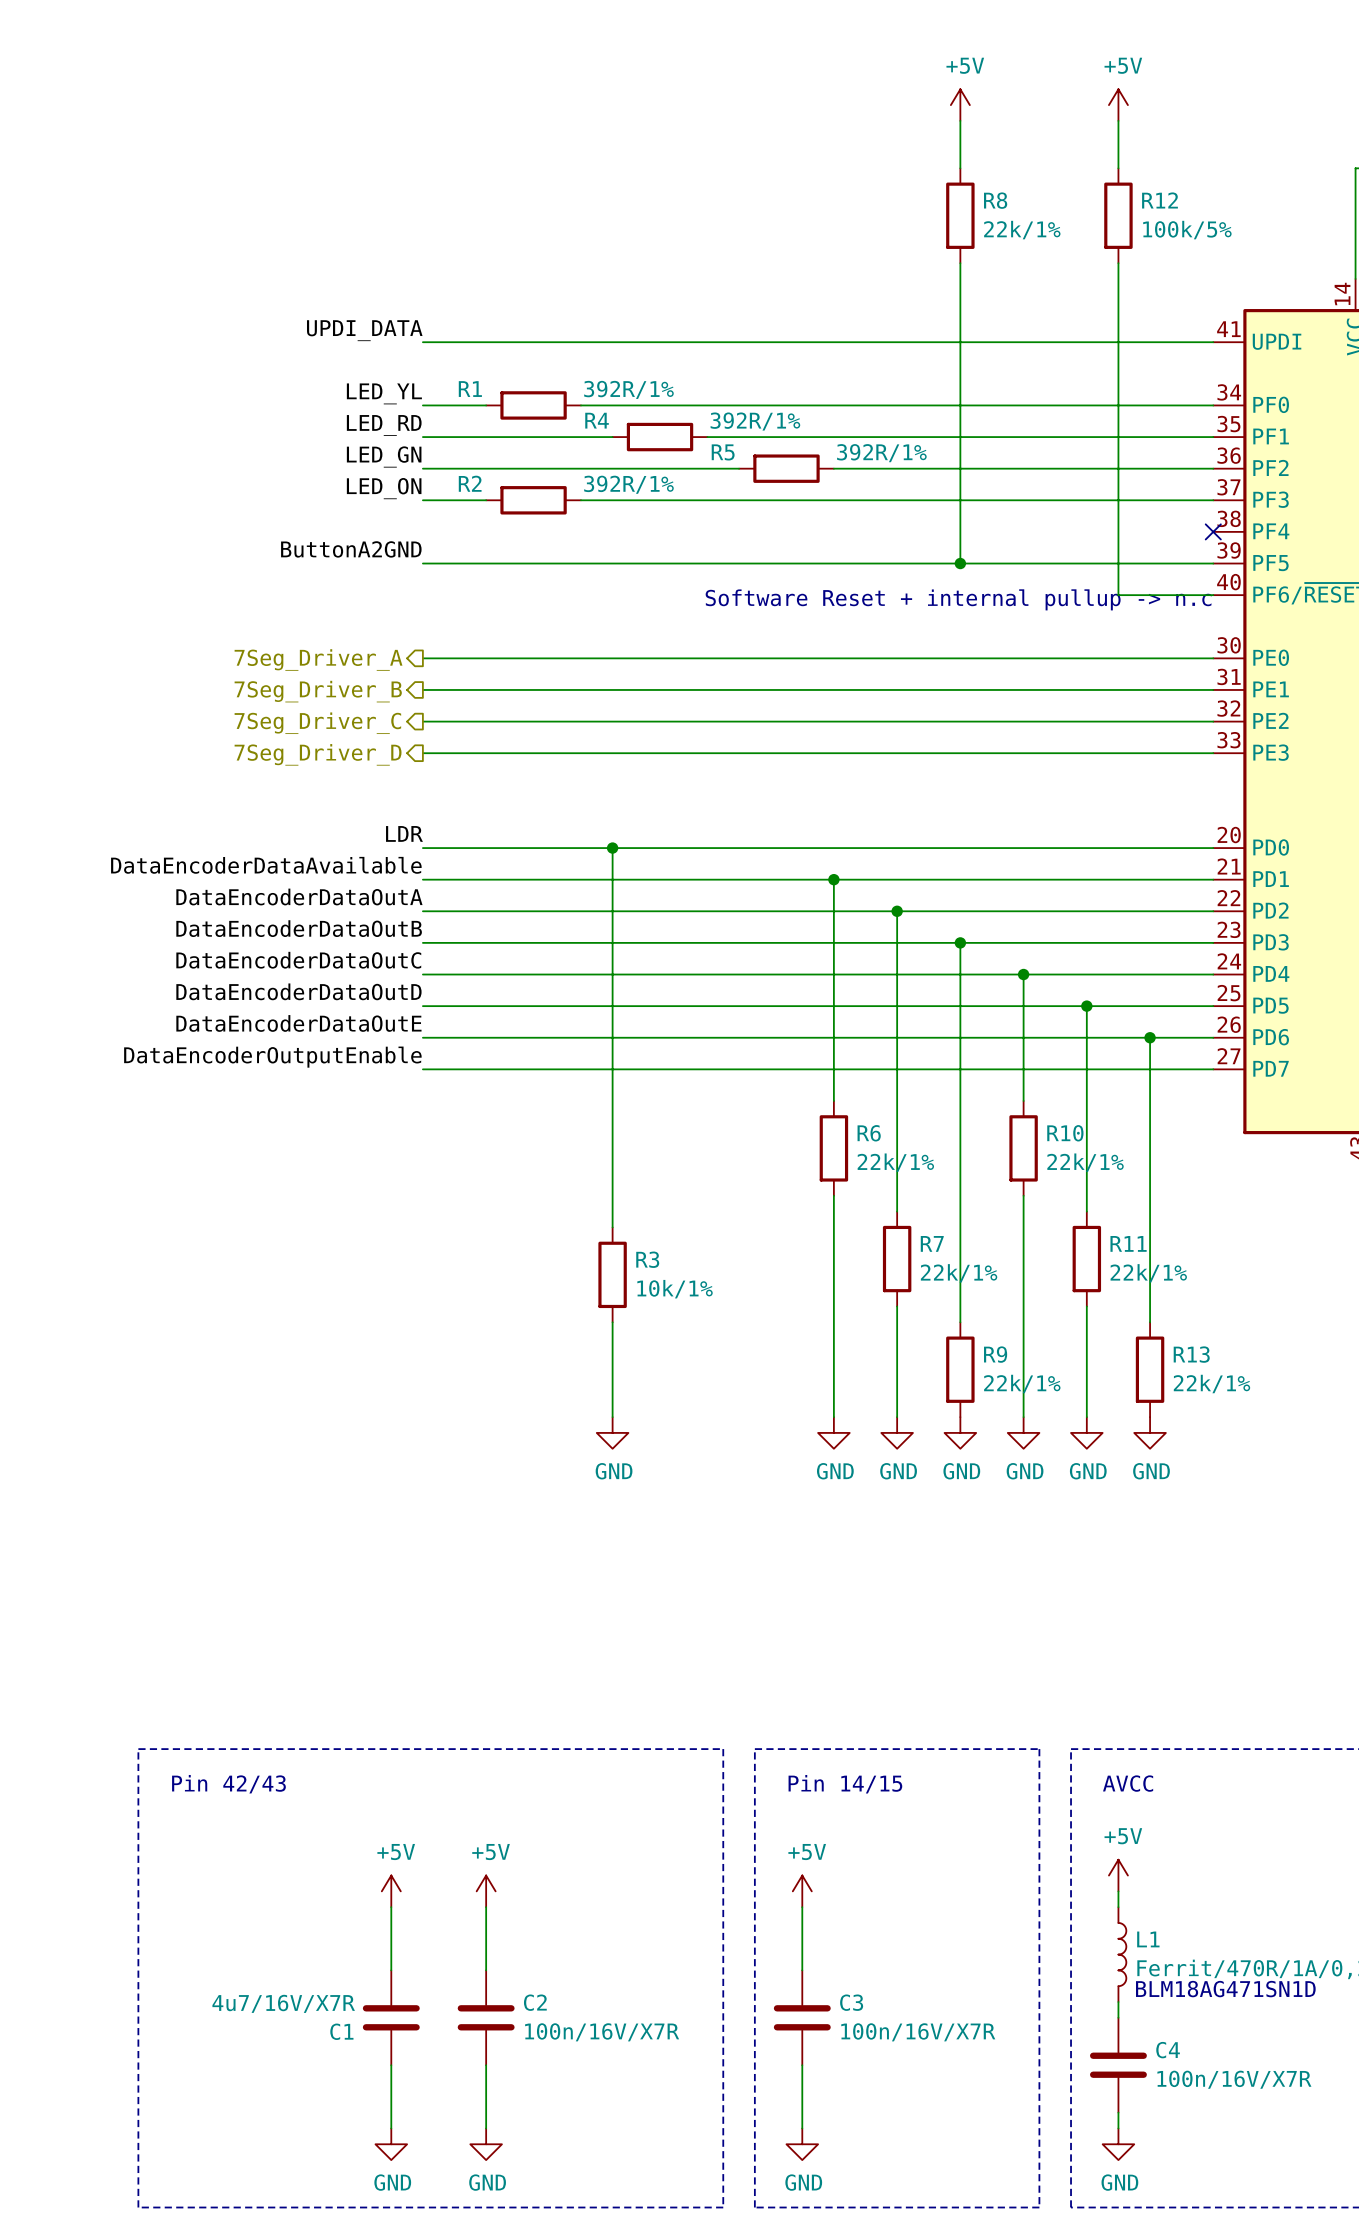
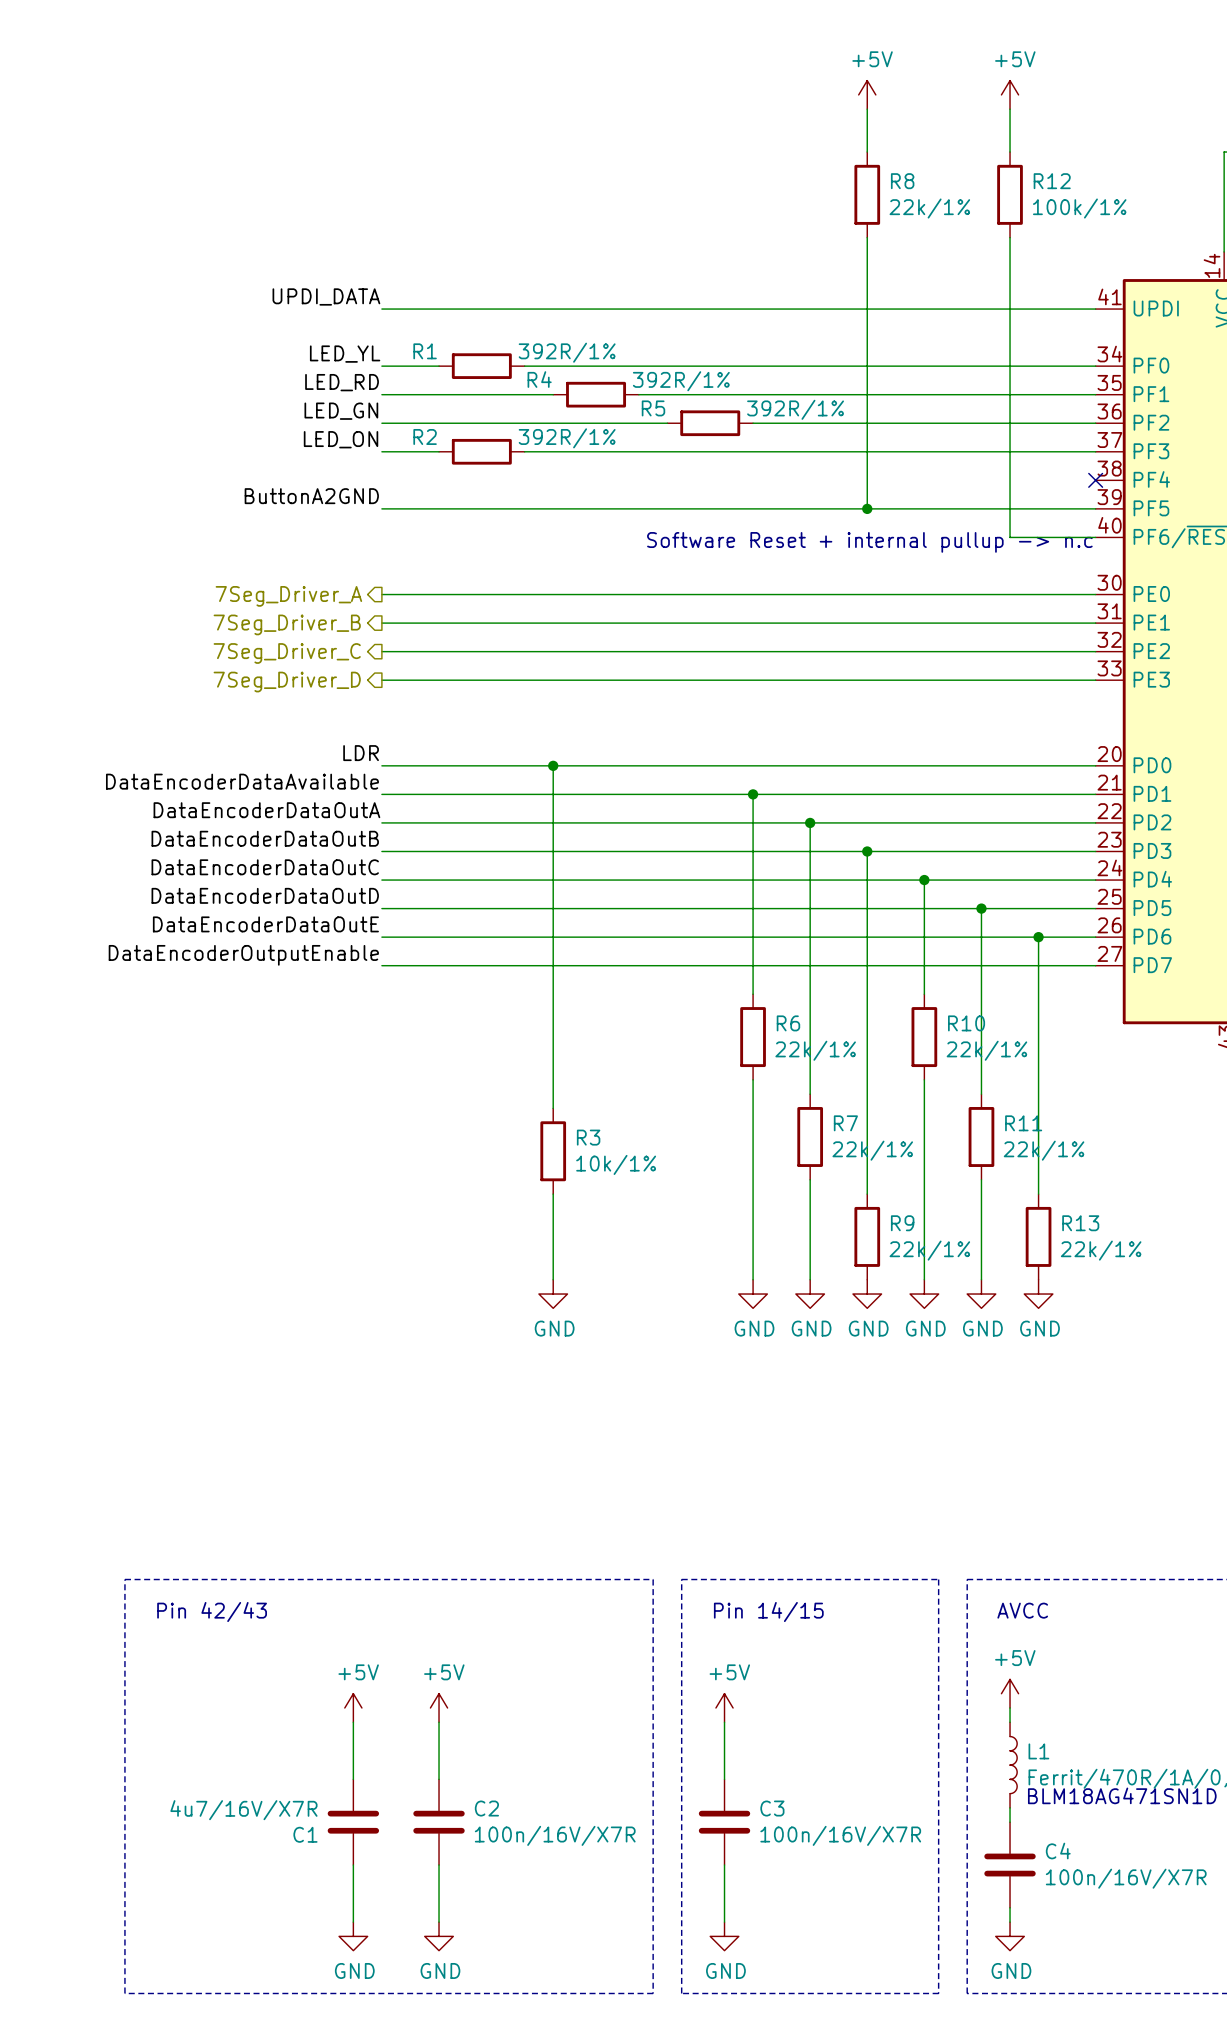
R12 value: 100k/5% (1187, 230) -> 100k/1% (1079, 208)

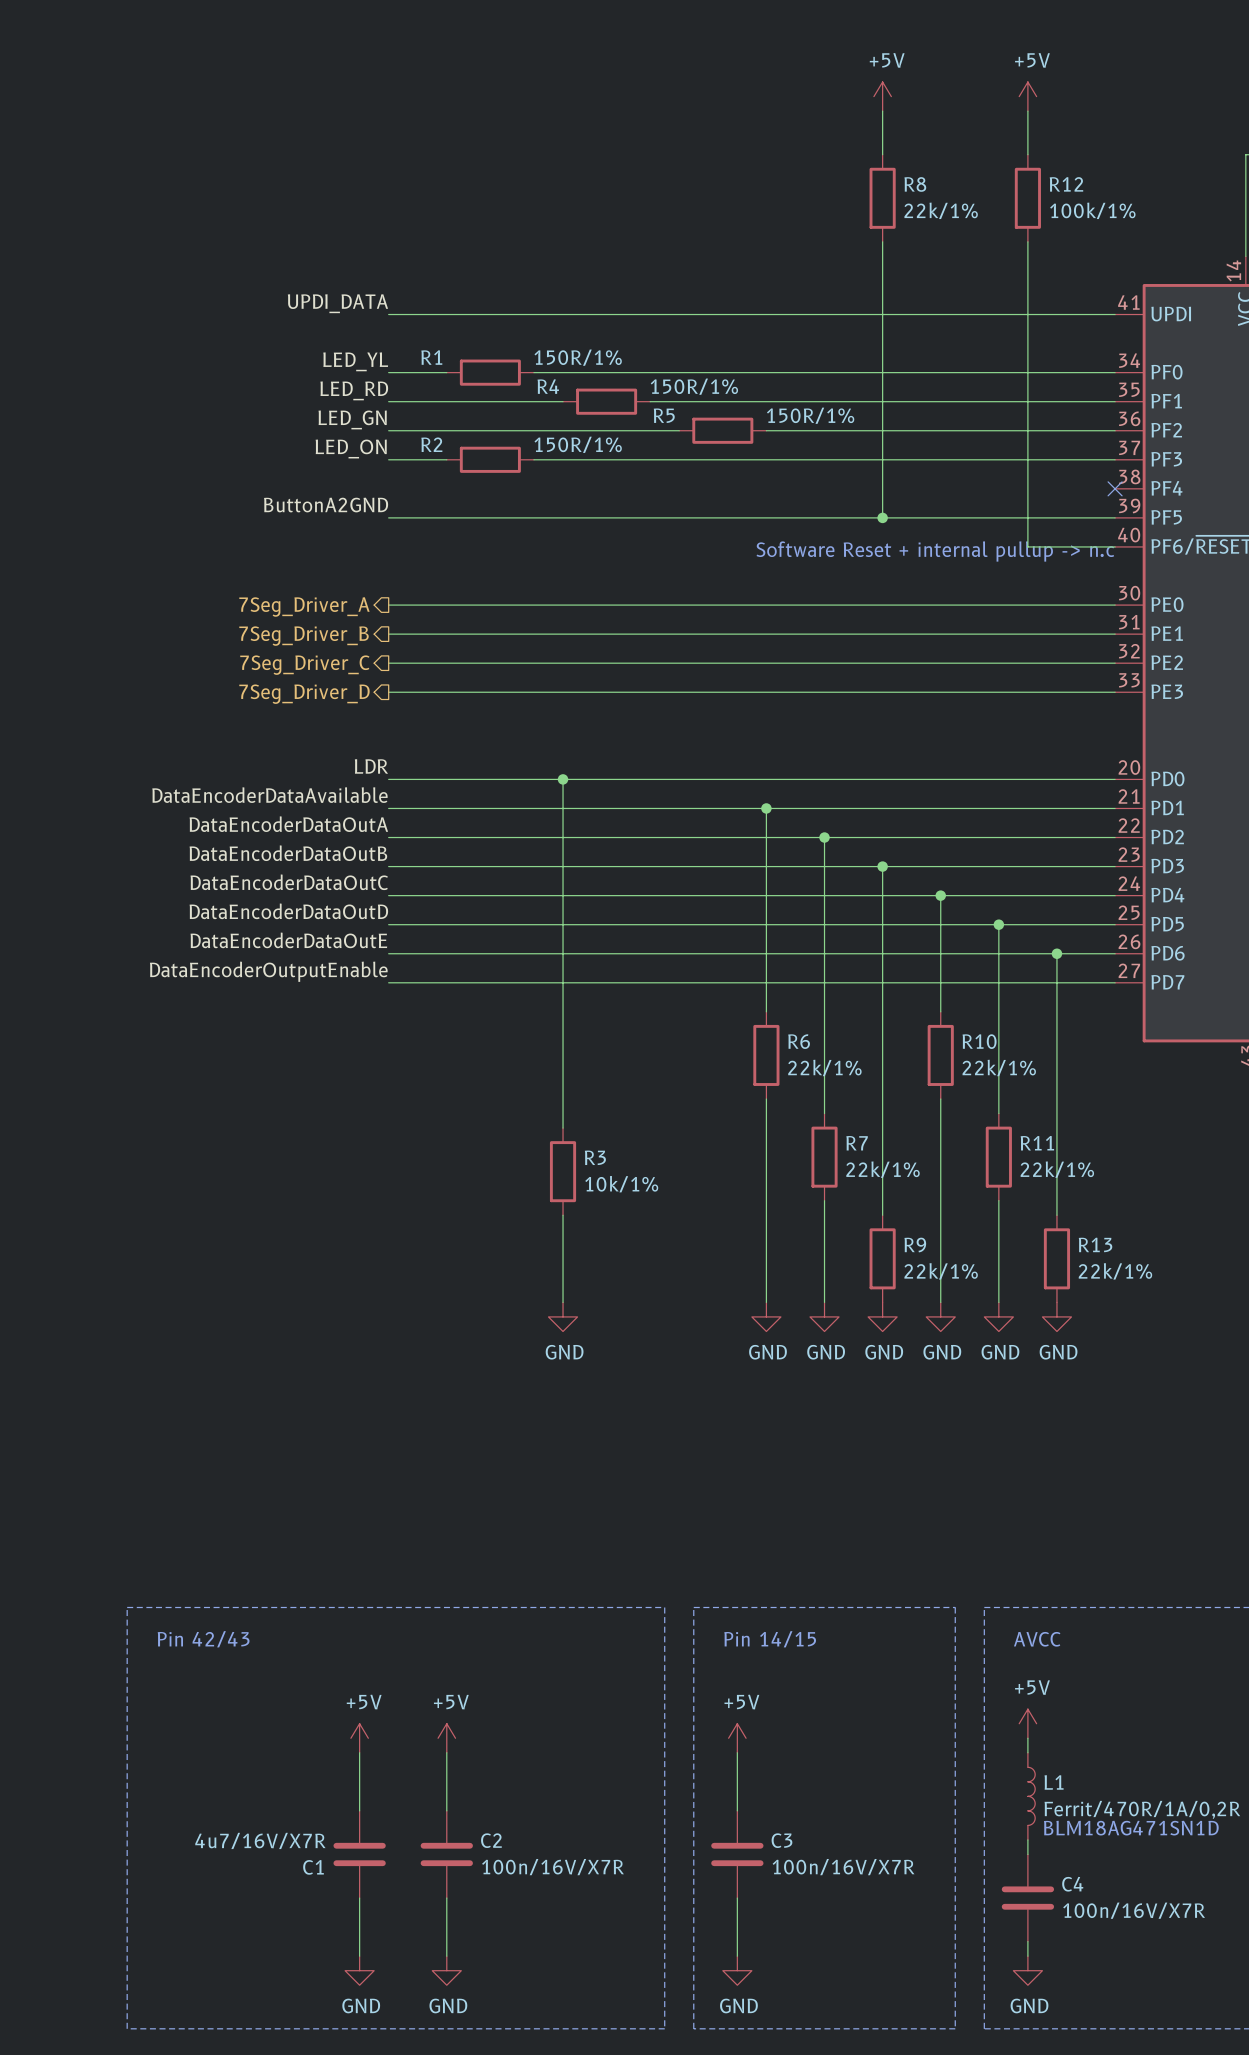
R1 value: 392R/1% (567, 352) -> 150R/1% (578, 357)
R4 value: 392R/1% (681, 381) -> 150R/1% (694, 386)
R5 value: 392R/1% (795, 409) -> 150R/1% (810, 415)
R2 value: 392R/1% (567, 438) -> 150R/1% (578, 444)

